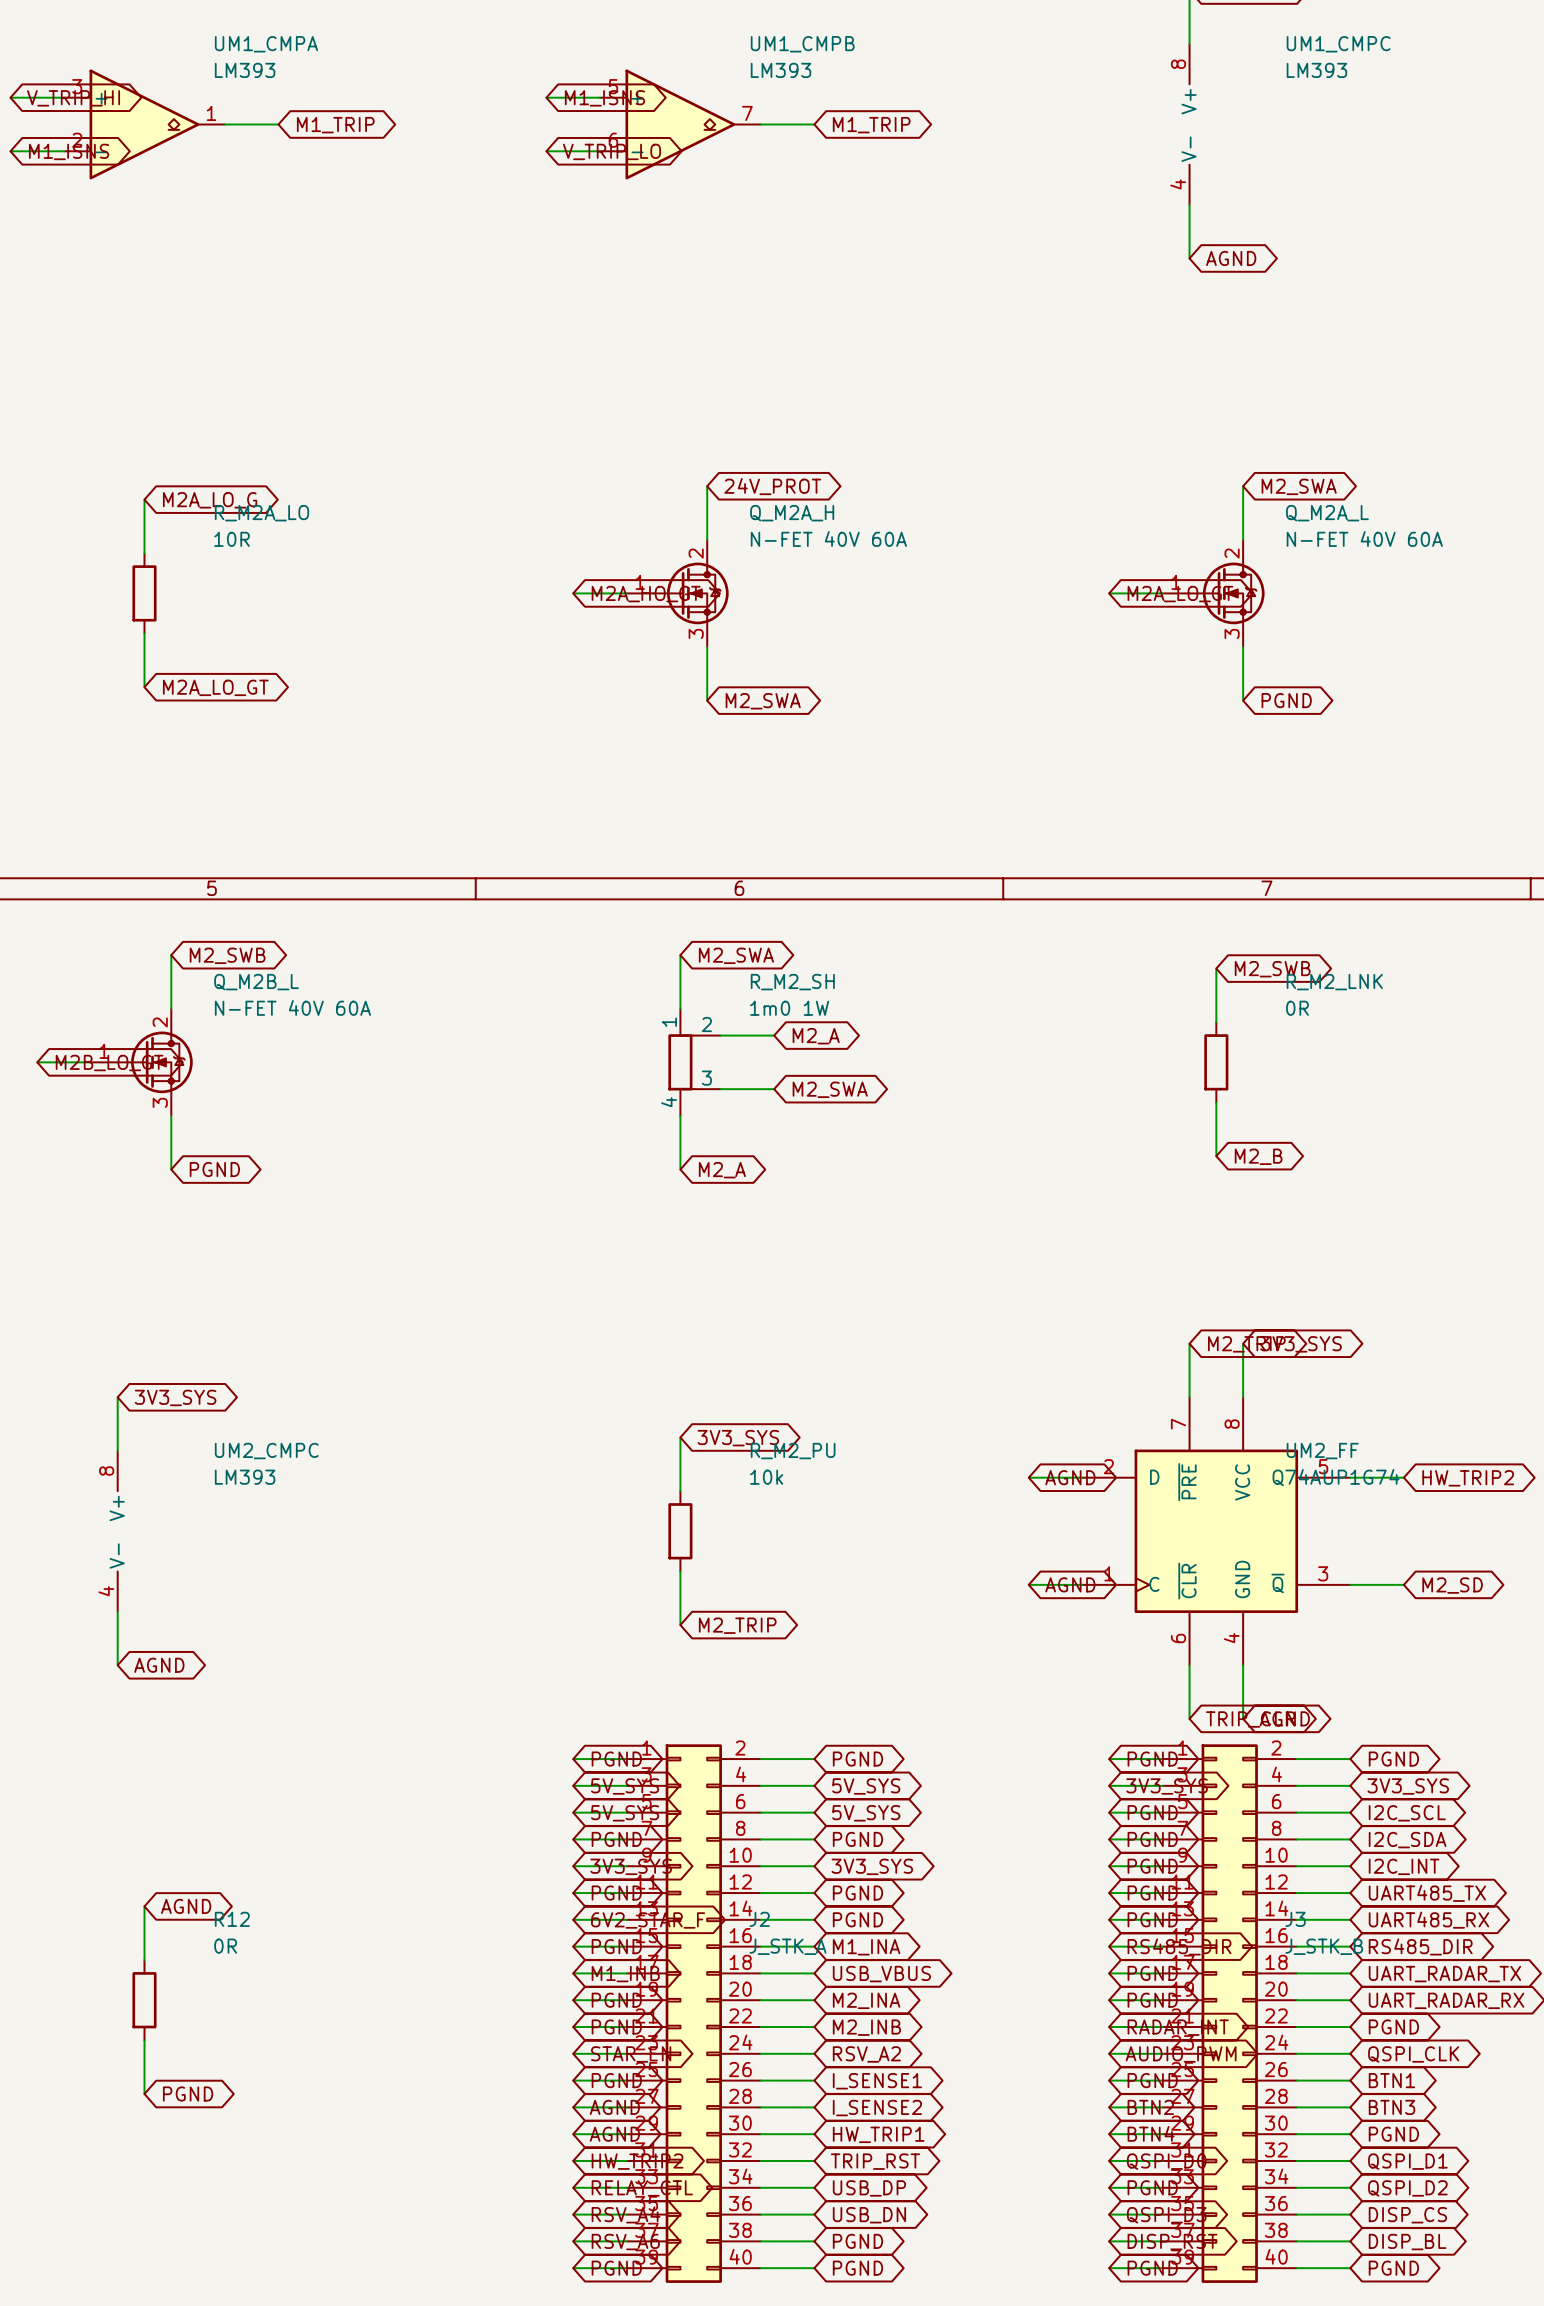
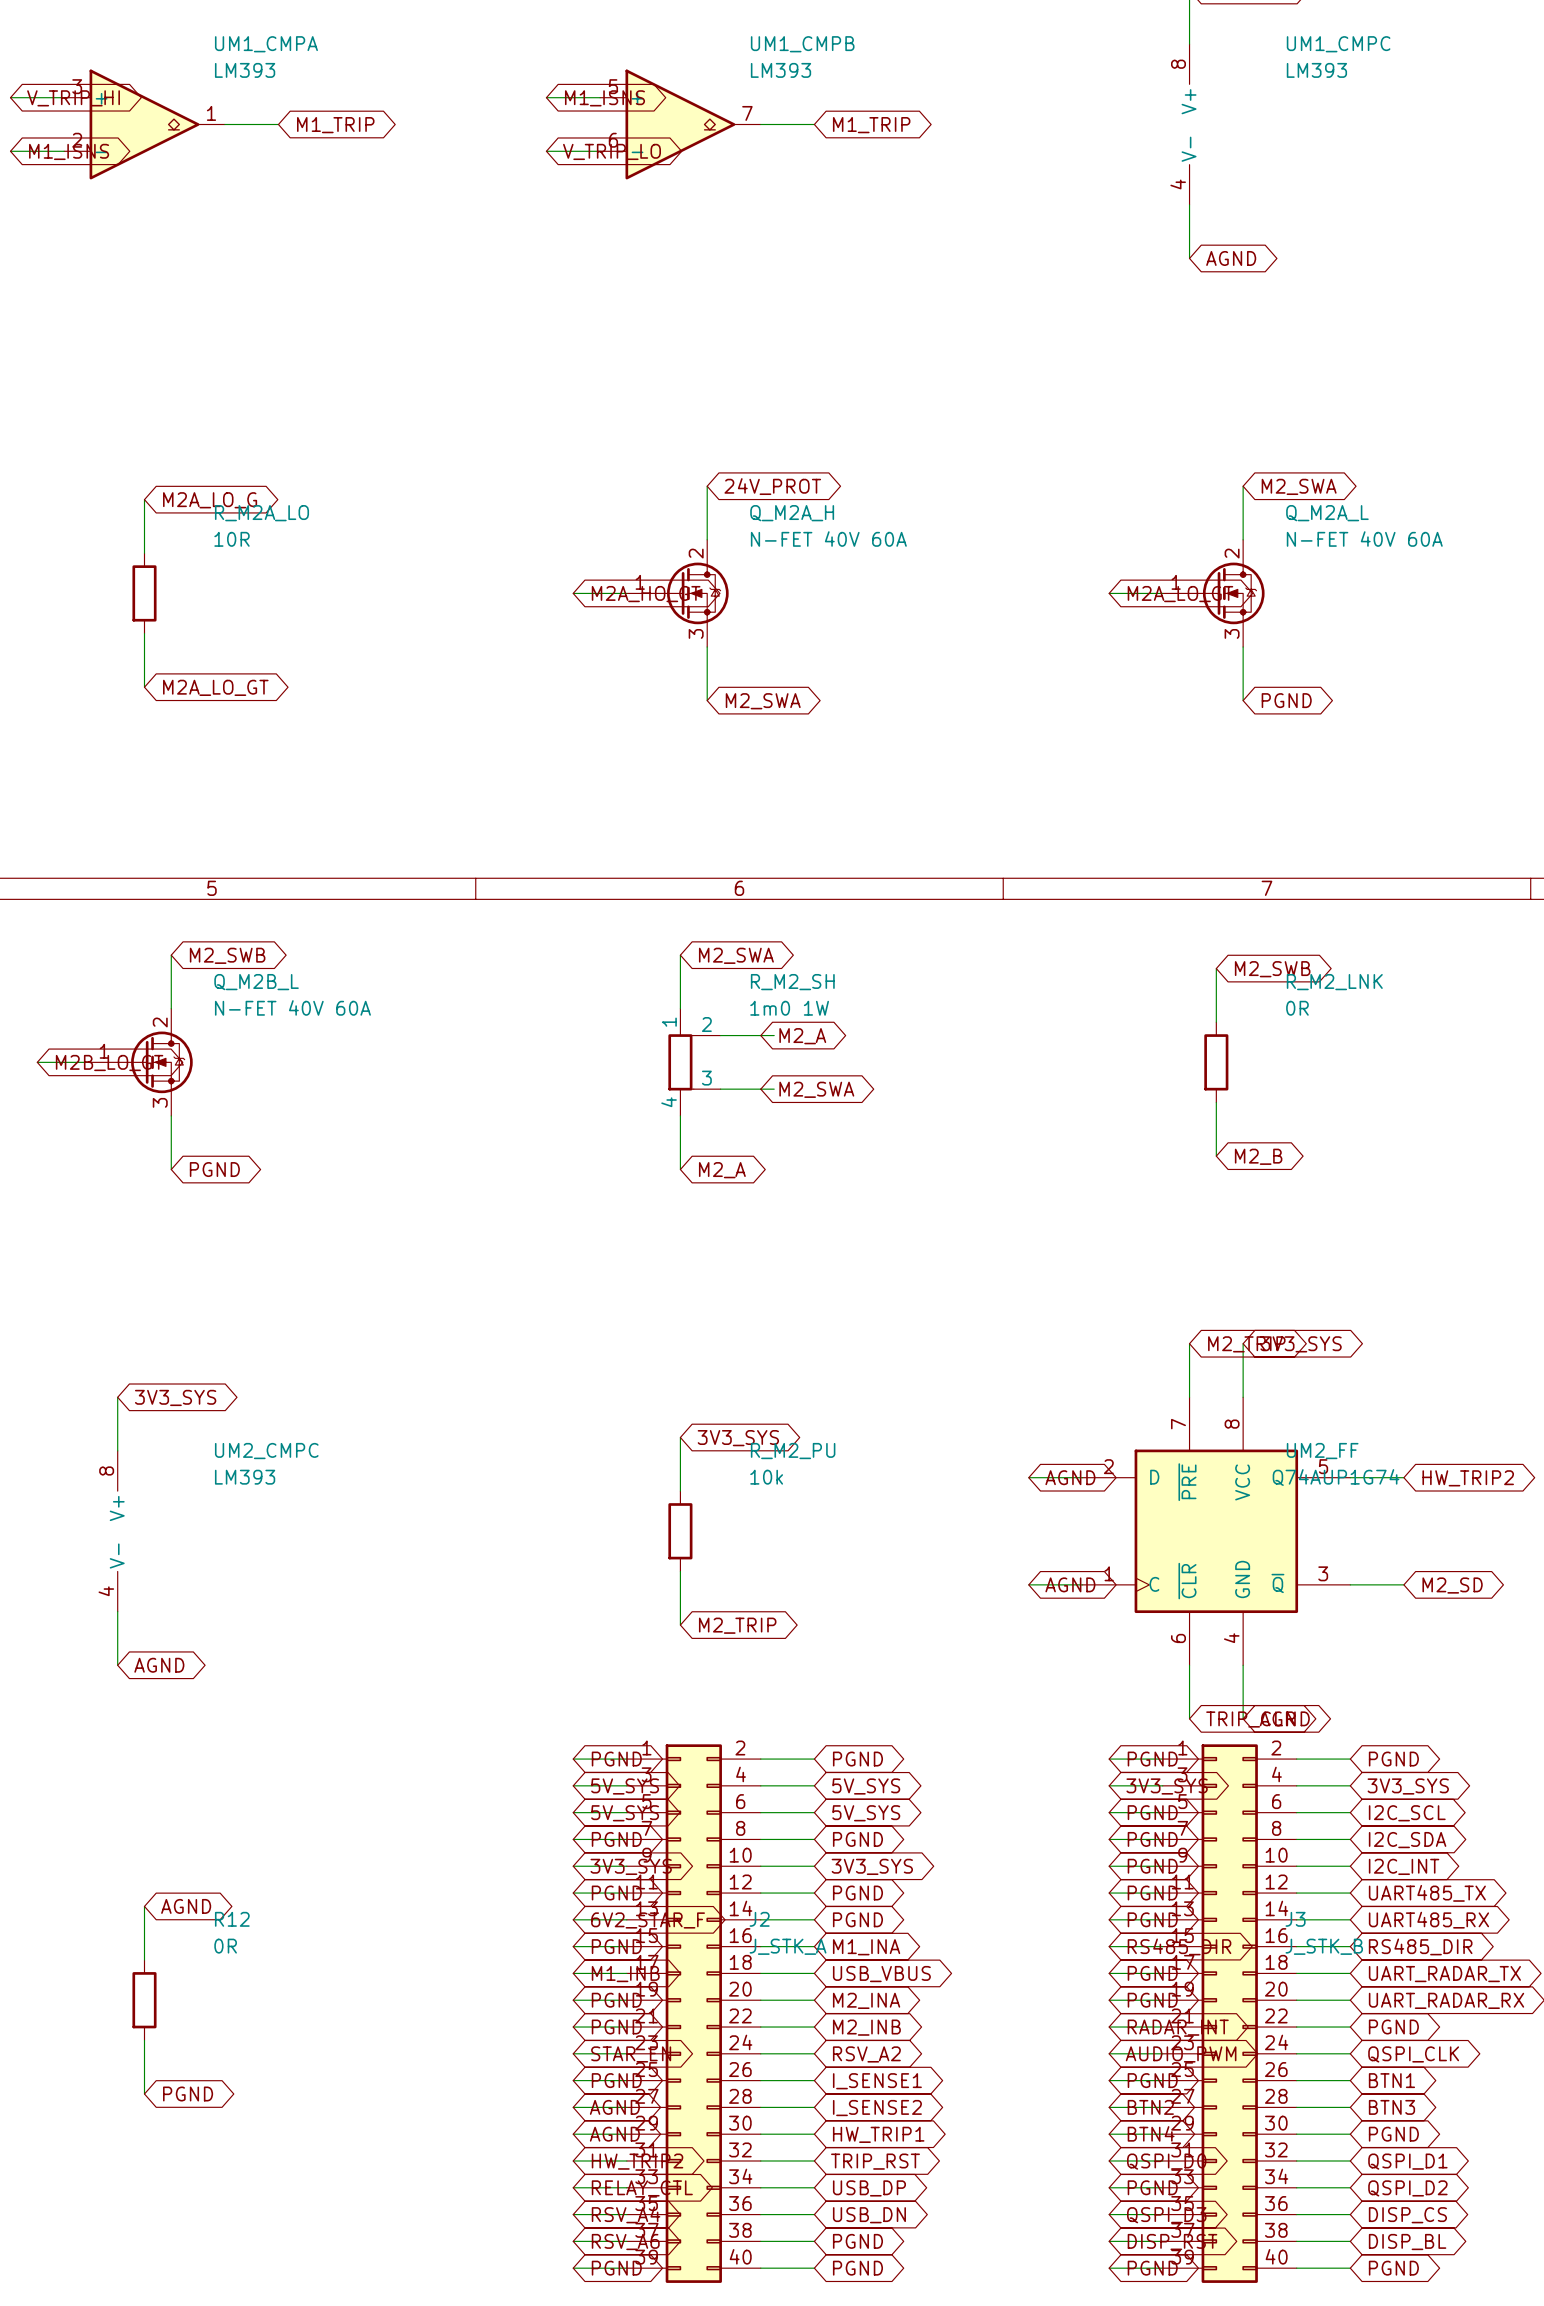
global label position: M2_A (816, 1036) -> M2_A (802, 1036)
global label position: M2_SWA (830, 1089) -> M2_SWA (816, 1089)

